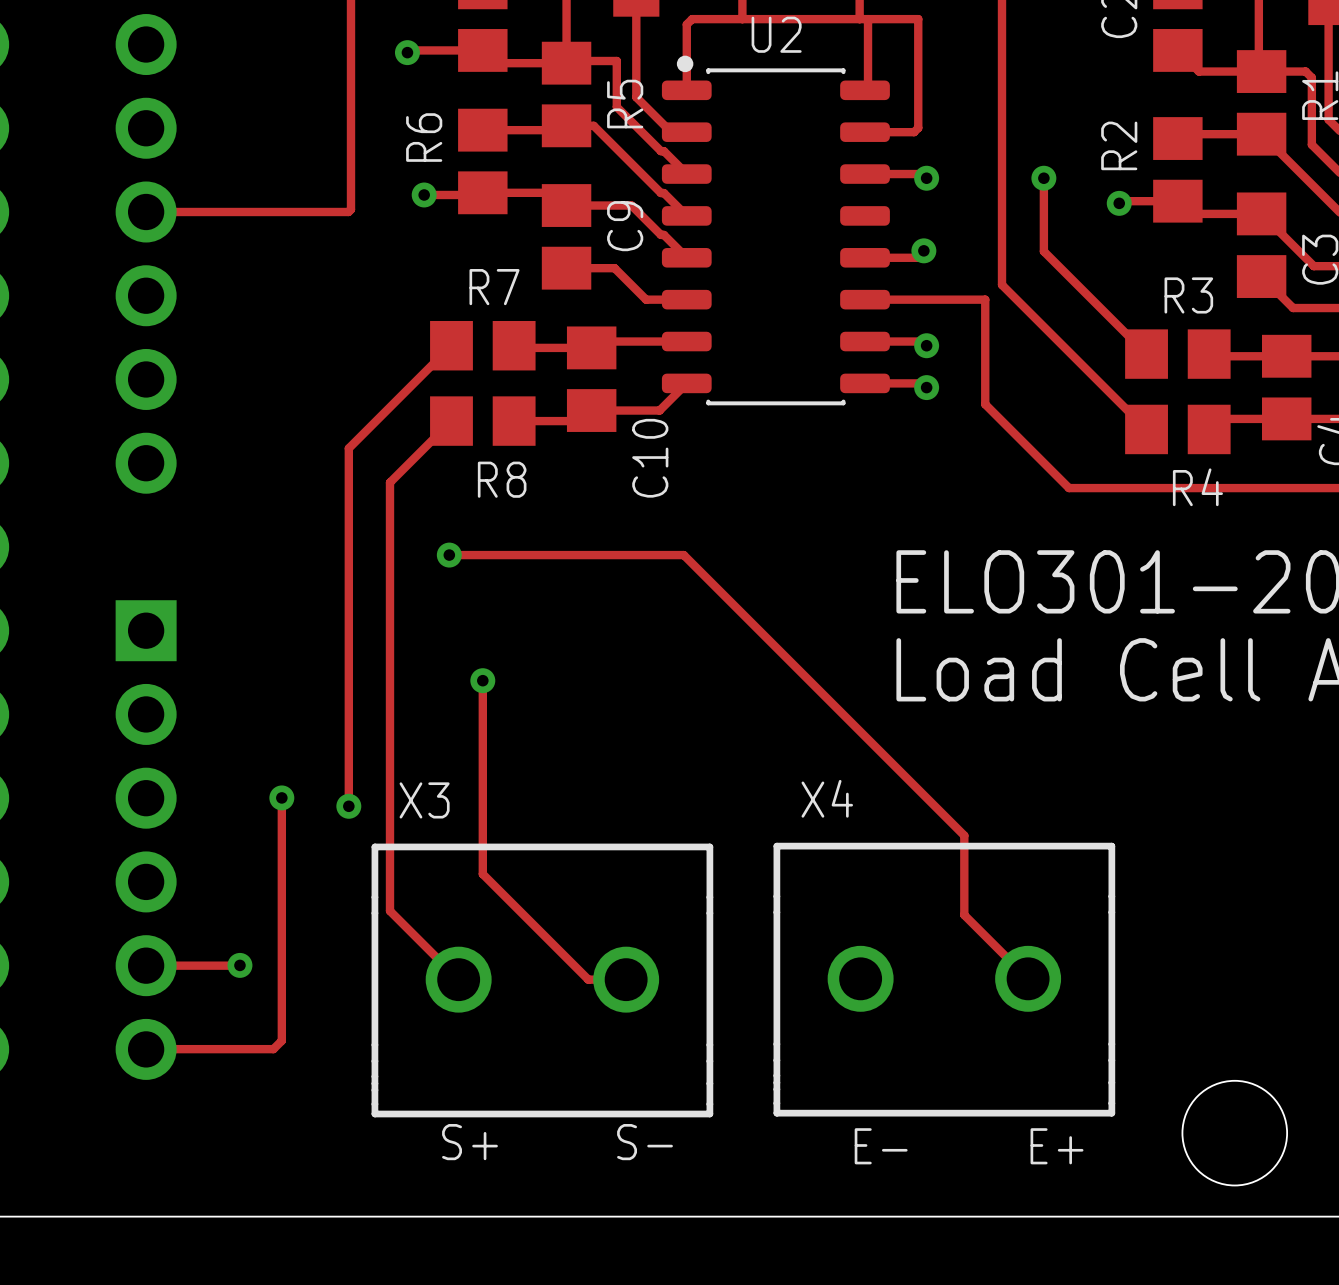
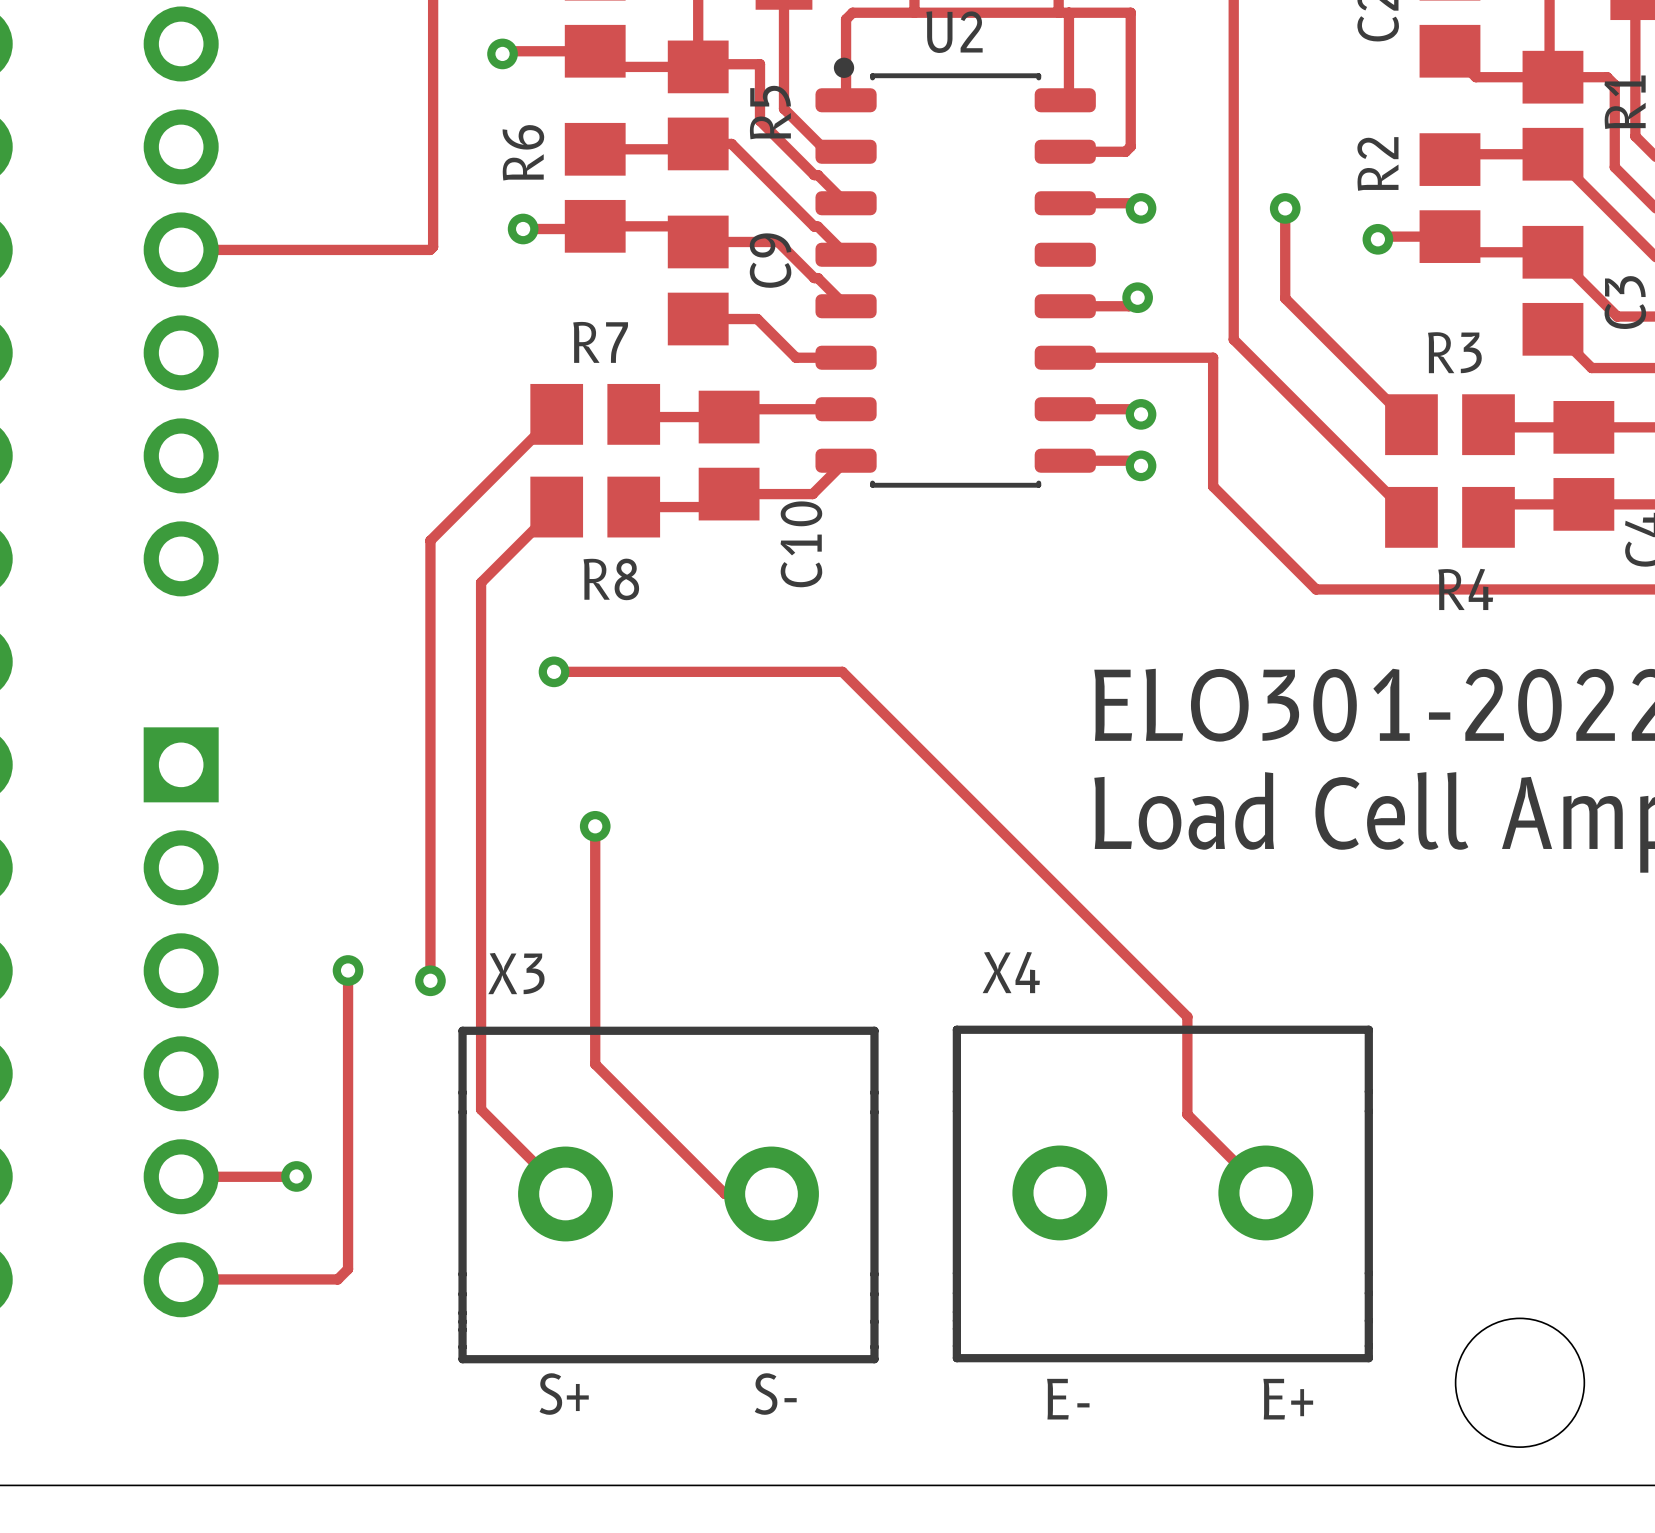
X4 footprint: [773, 842, 1116, 1117] -> [952, 1025, 1373, 1363]
X3 footprint: [371, 843, 714, 1118] -> [458, 1026, 879, 1364]

